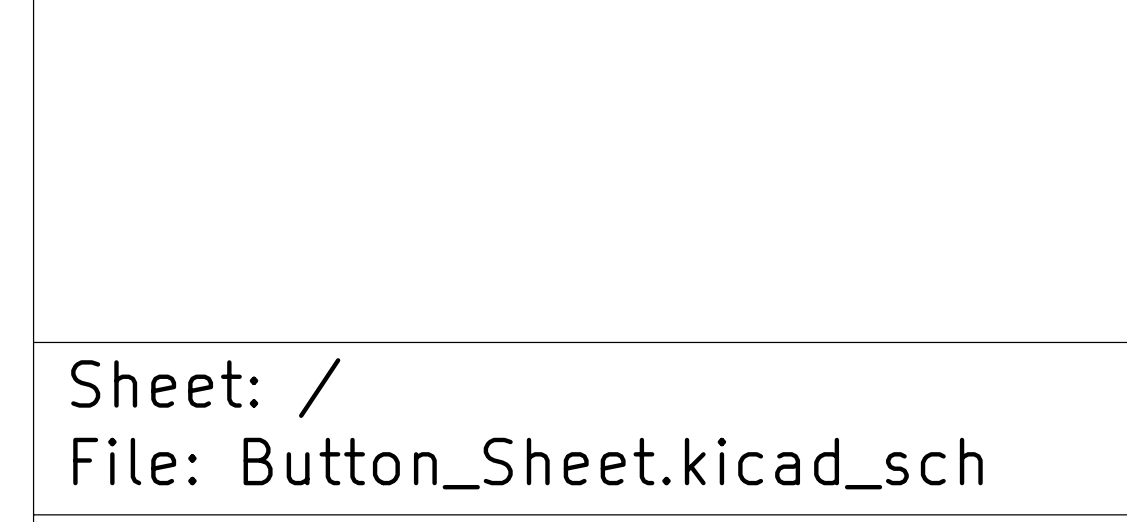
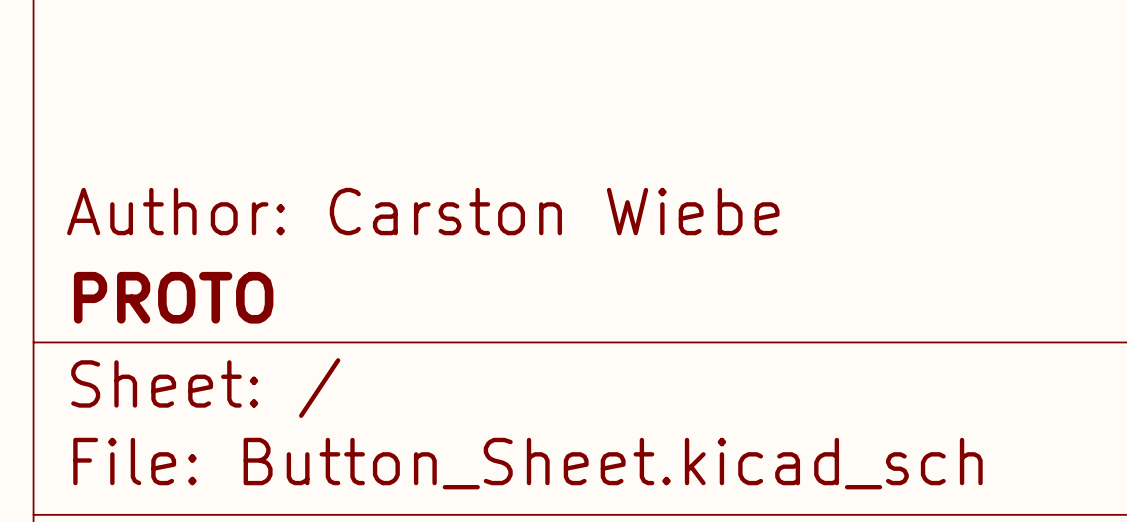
title block: none -> Author: Carston Wiebe (423, 211)
title block: none -> PROTO (173, 297)

